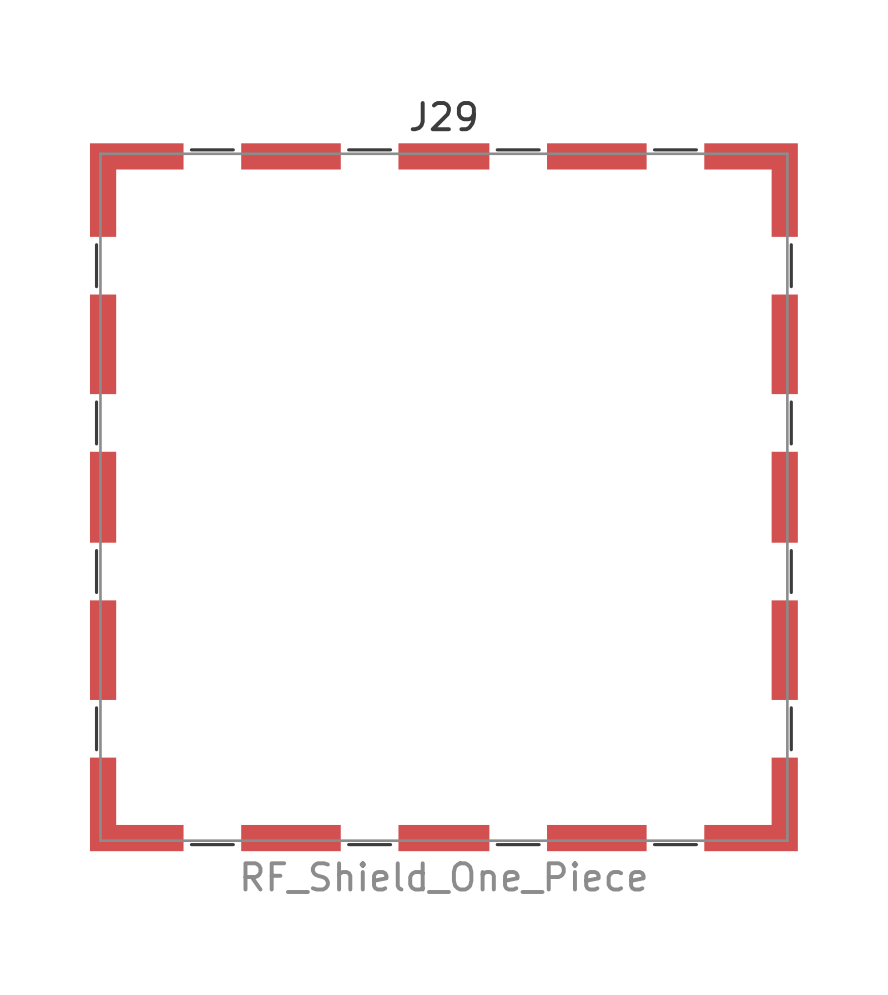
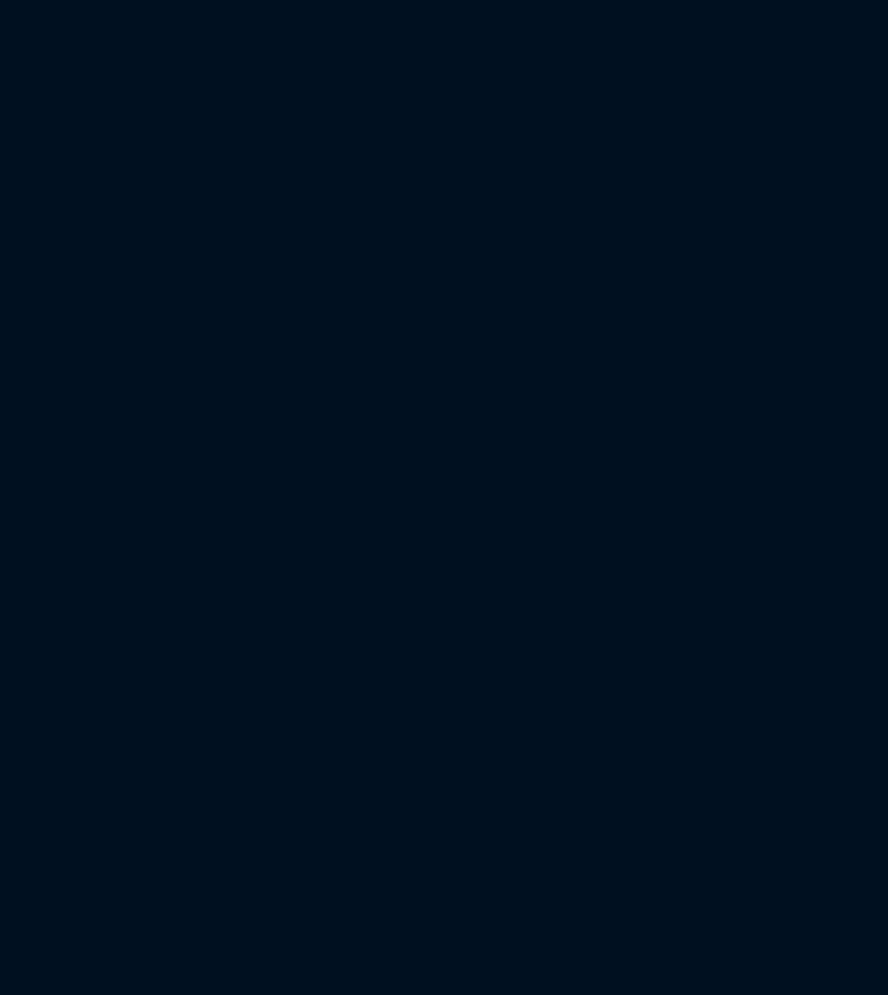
J29: RF_Shield_One_Piece (443, 497) -> none

